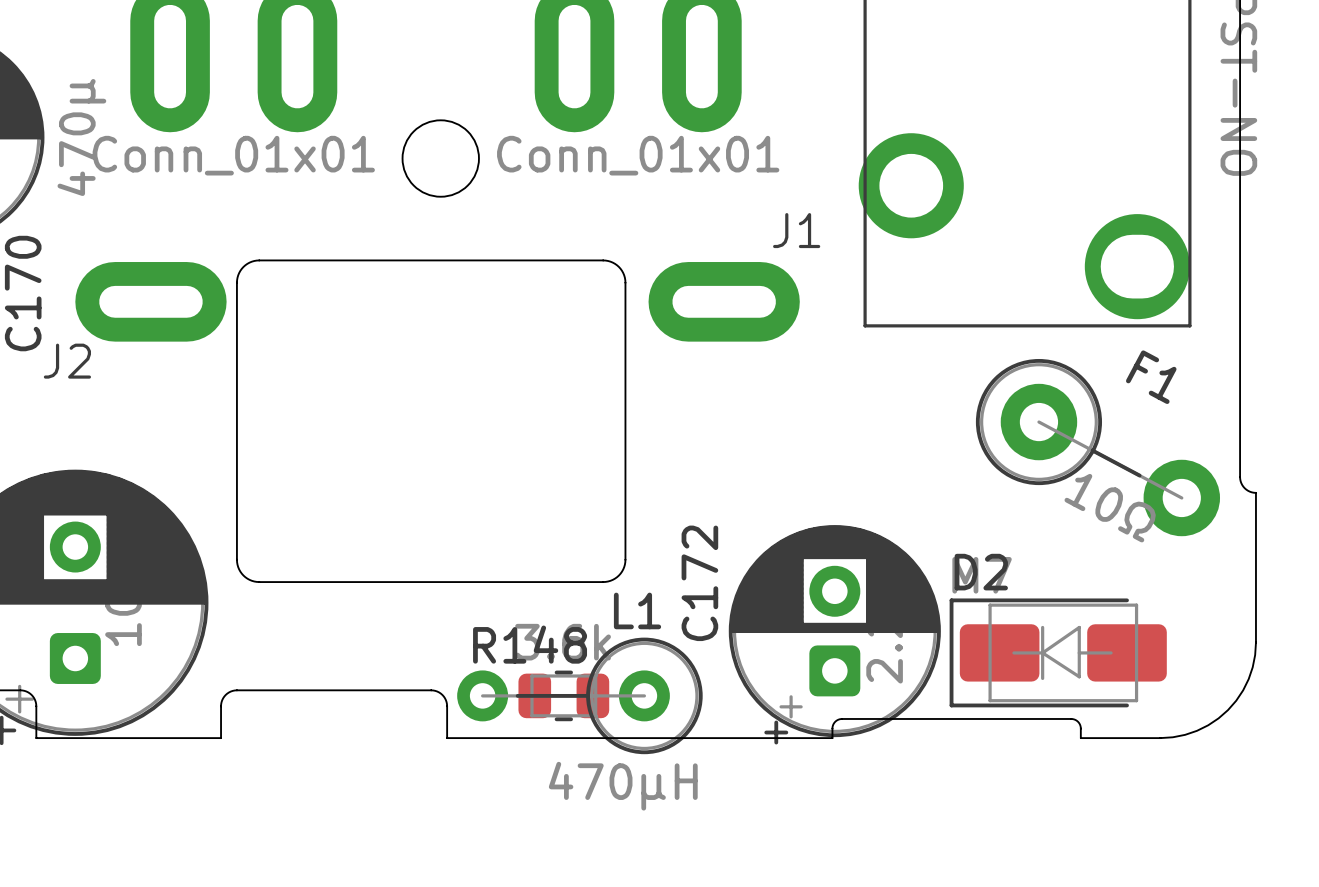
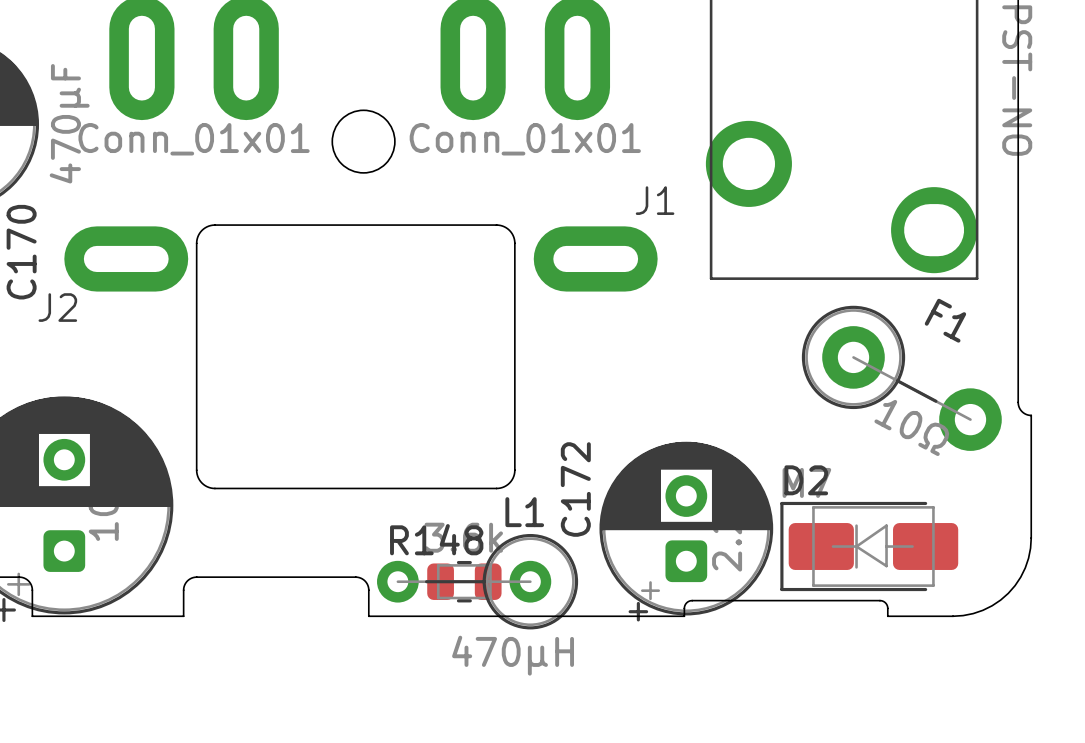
C170 value: 470µ (81, 137) -> 470µF (69, 123)

